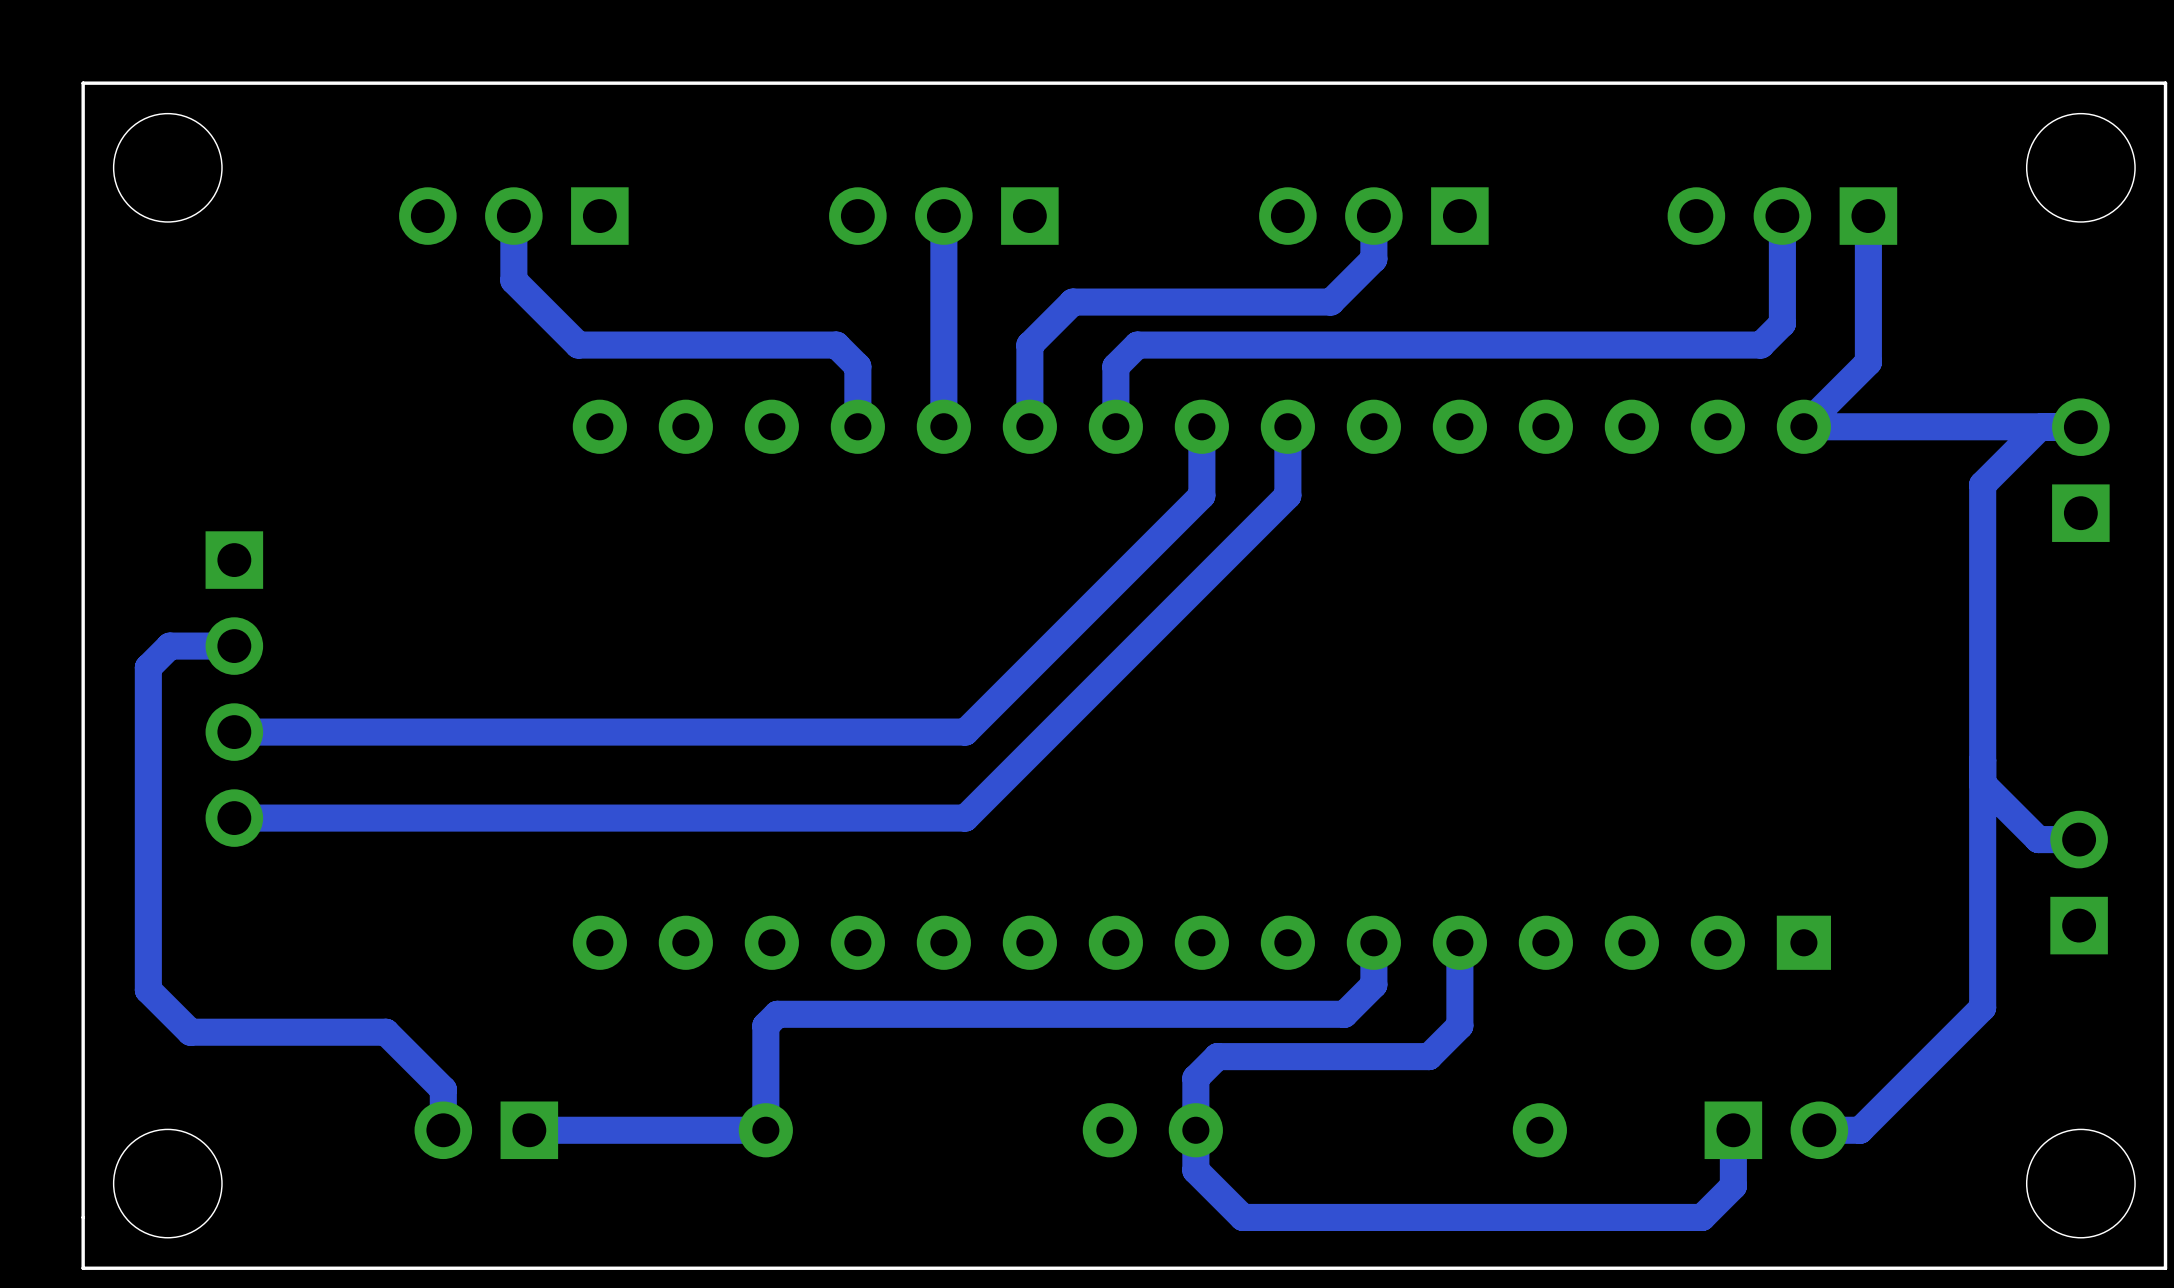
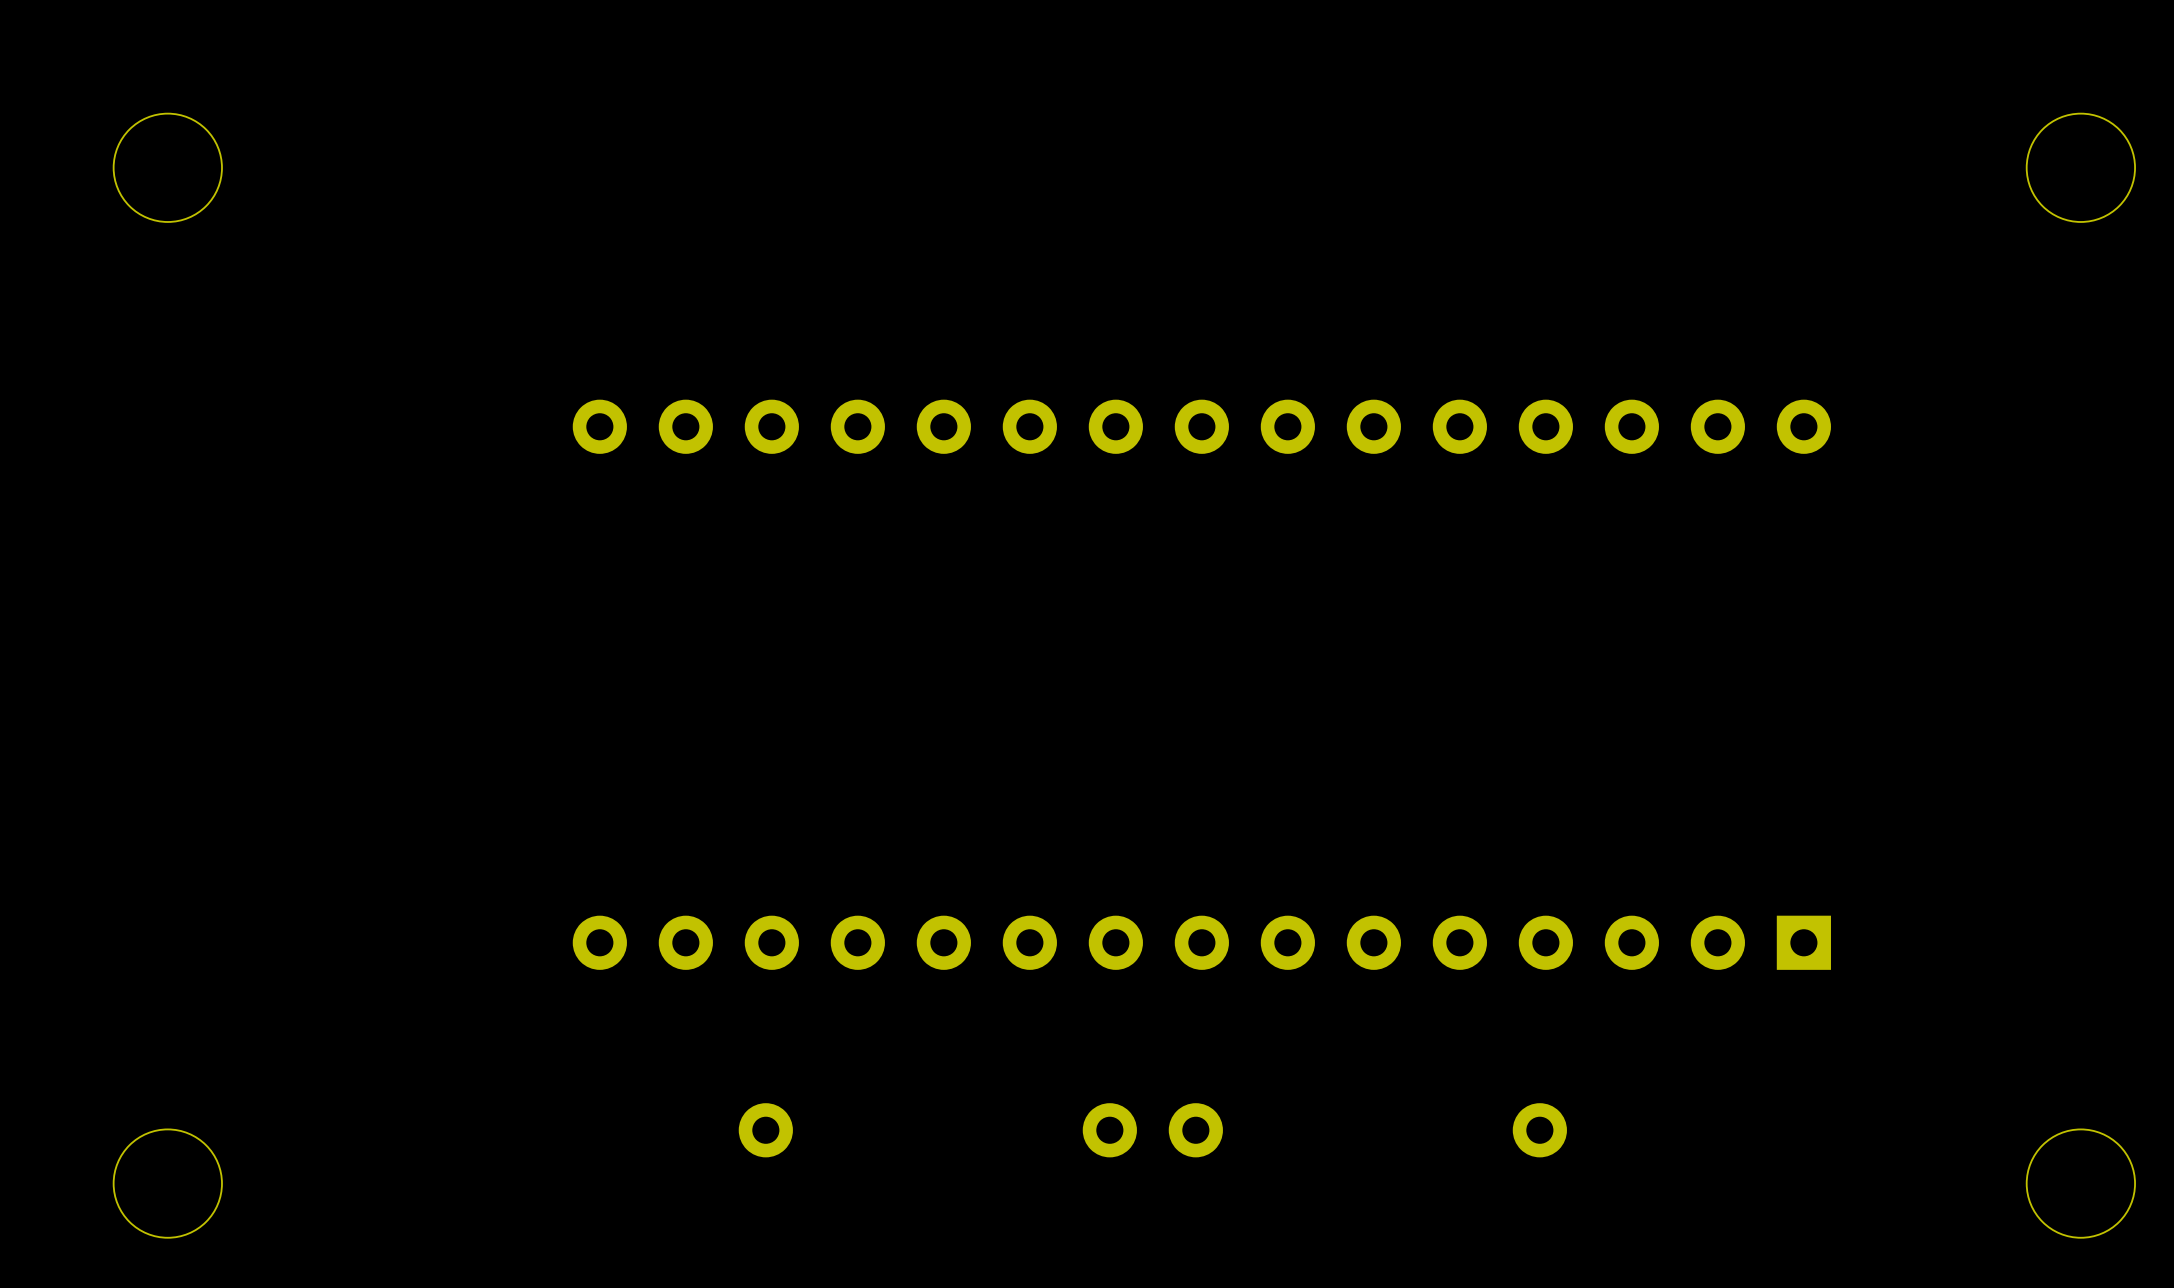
board edge: (2165, 83) (83, 83) (83, 1268) (2165, 1268) (2165, 83) -> none
track: (513, 216) (513, 280) (578, 345) (836, 345) (857, 366) (857, 426) -> none
part: (513, 216) -> none
track: (943, 216) (943, 426) -> none
part: (943, 216) -> none
track: (1373, 216) (1373, 259) (1330, 302) (1072, 302) (1029, 345) (1029, 426) -> none
part: (1373, 216) -> none
track: (1782, 216) (1782, 323) (1760, 345) (1137, 345) (1115, 366) (1115, 426) -> none
part: (1782, 216) -> none
track: (1868, 216) (1868, 362) (1803, 426) (2080, 426) -> none
track: (1201, 426) (1201, 495) (965, 732) (234, 732) -> none
track: (1287, 426) (1287, 495) (965, 818) (234, 818) -> none
track: (2080, 427) (2040, 427) (1982, 484) (1982, 1007) (1860, 1130) (1819, 1130) -> none
part: (2080, 470) -> none
track: (234, 646) (169, 646) (148, 667) (148, 990) (190, 1032) (385, 1032) (443, 1089) (443, 1130) -> none
part: (234, 689) -> none
track: (1982, 783) (2038, 839) (2079, 839) -> none
part: (2079, 882) -> none
track: (1373, 942) (1373, 984) (1344, 1014) (777, 1014) (765, 1025) (765, 1130) (529, 1130) -> none
track: (1459, 942) (1459, 1025) (1429, 1056) (1217, 1056) (1195, 1078) (1195, 1170) (1242, 1217) (1702, 1217) (1733, 1186) (1733, 1130) -> none
part: (486, 1130) -> none
part: (1776, 1130) -> none

